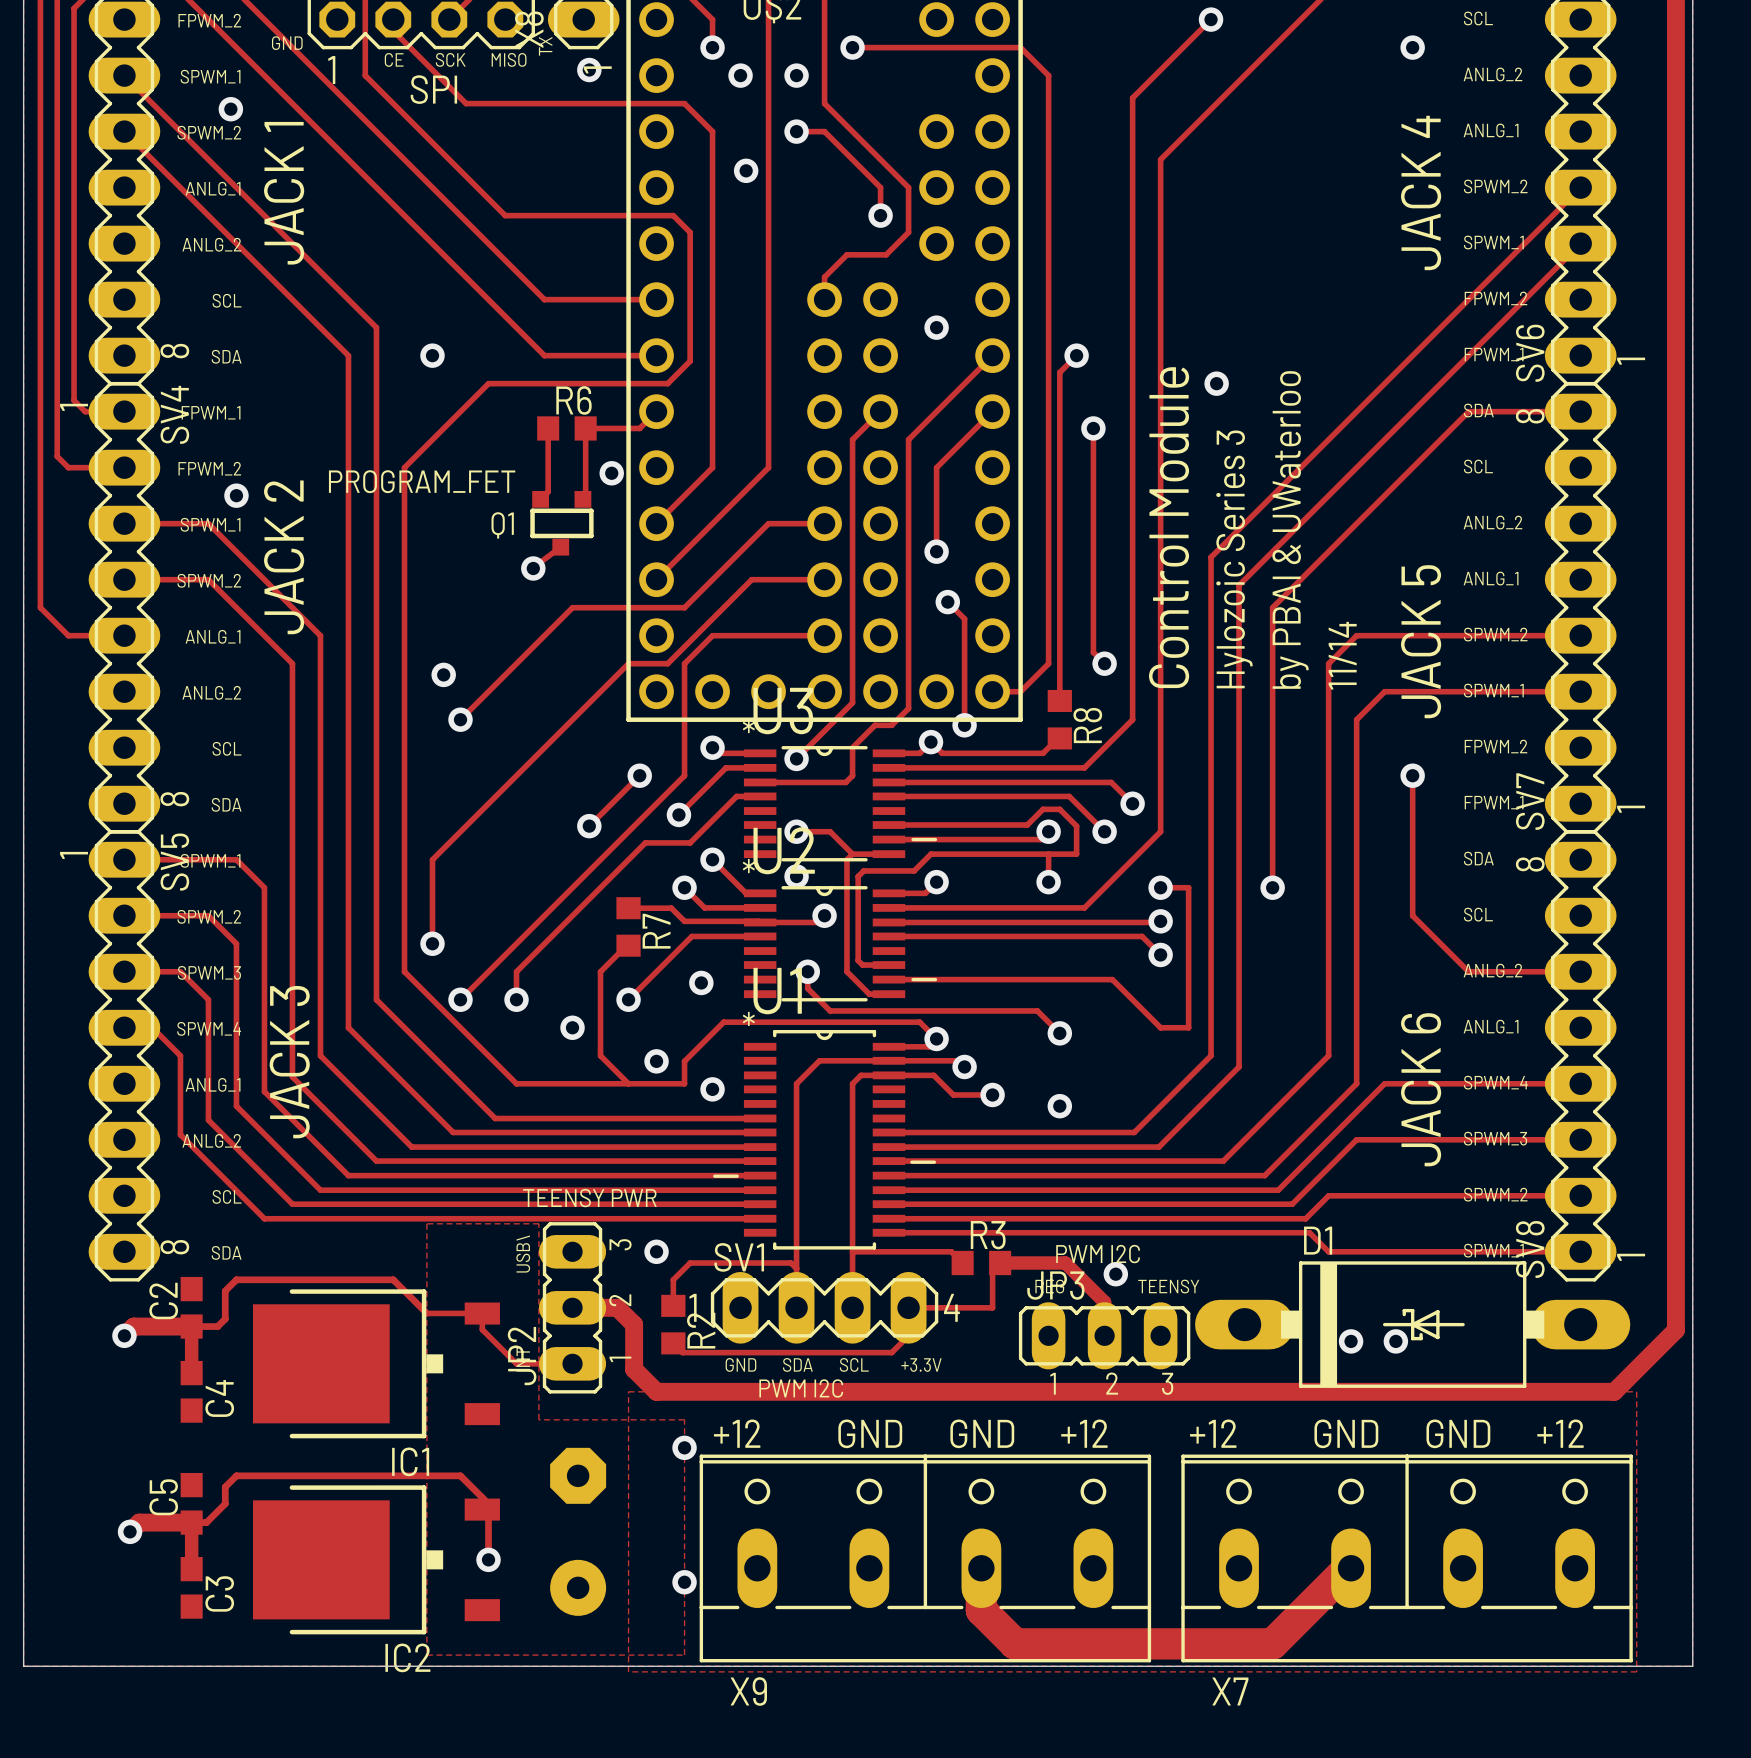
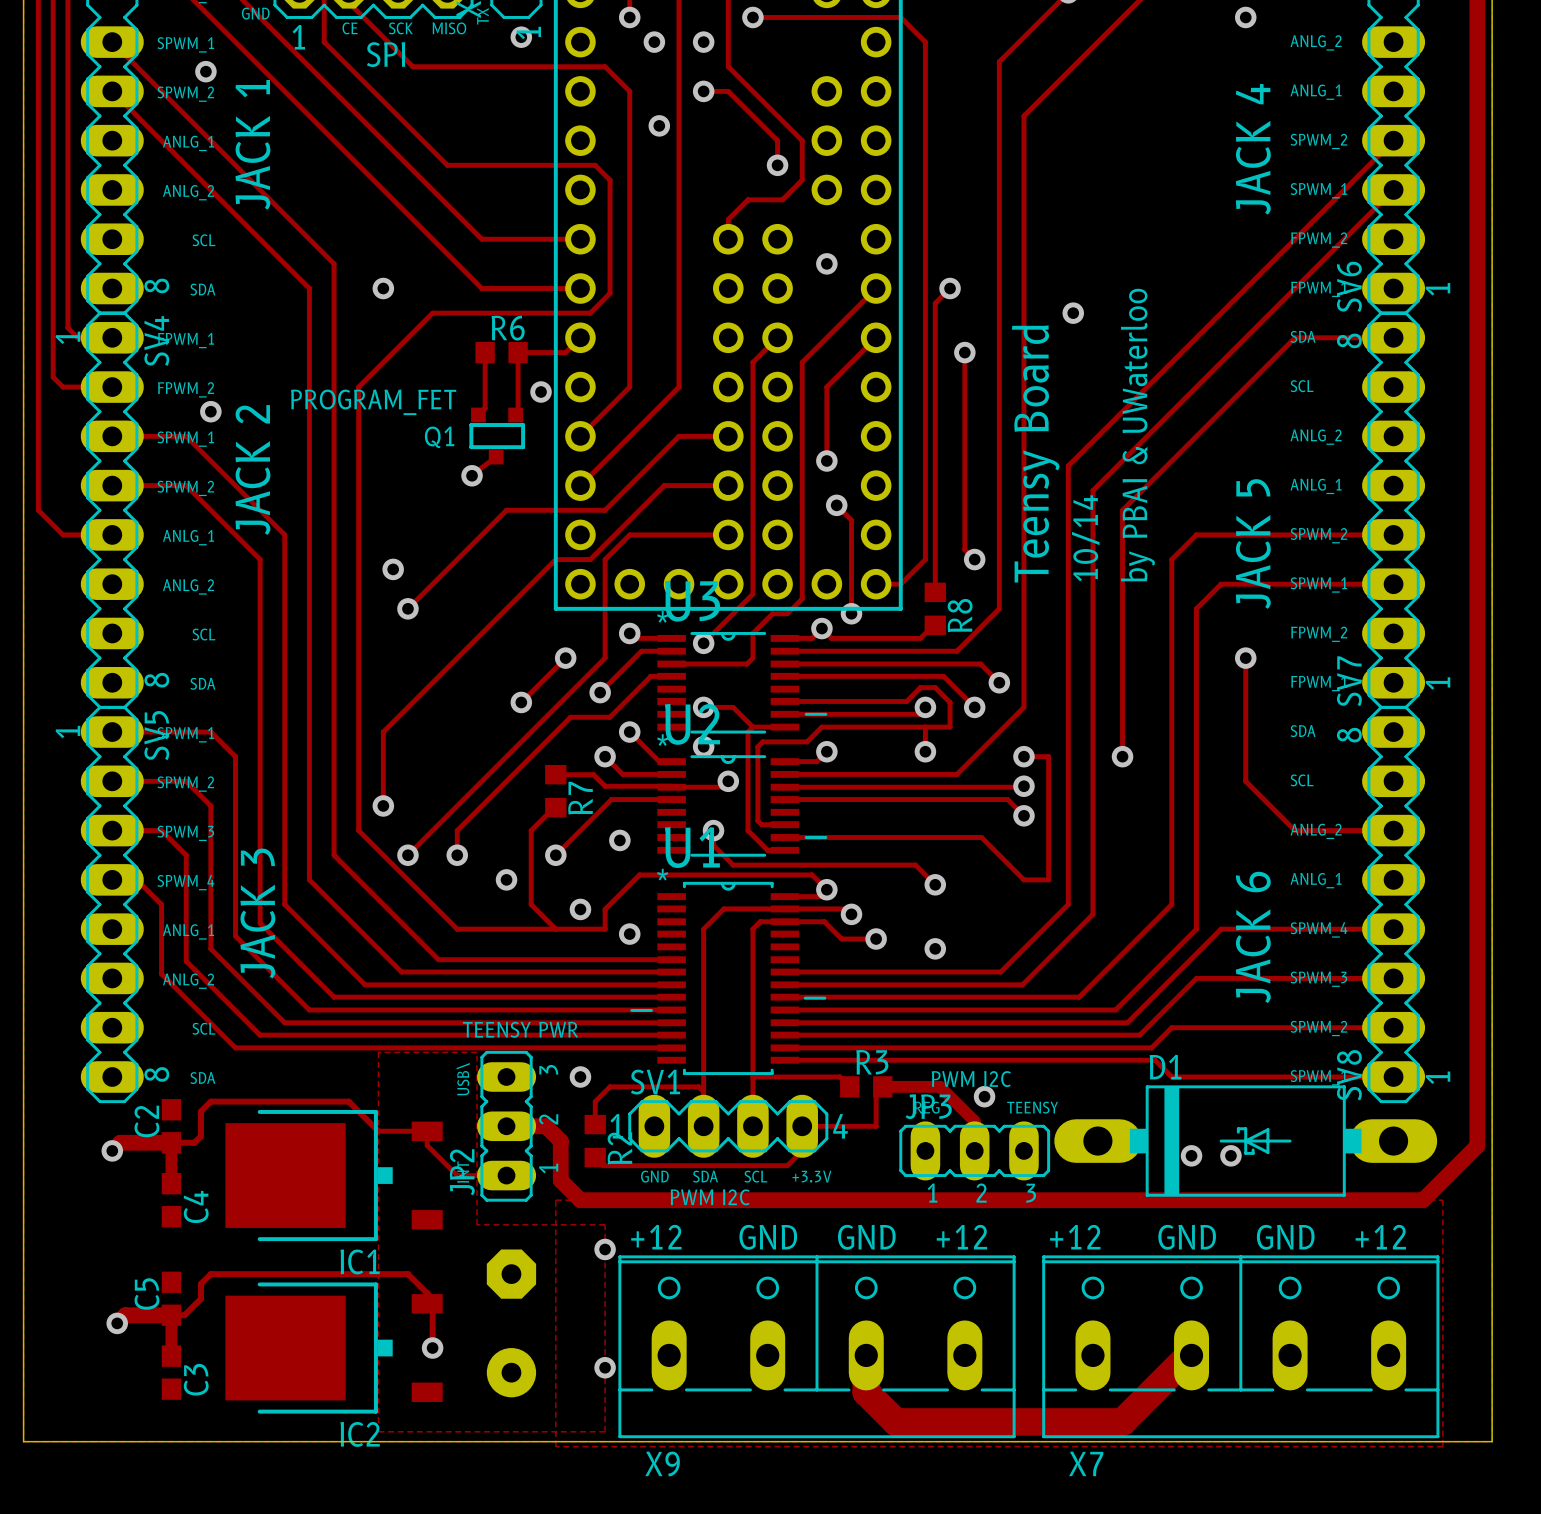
text: Control Module (1169, 527) -> Teensy Board (1035, 453)
text: Hylozoic Series 3 (1234, 559) -> 10/14 (1085, 538)
text: 11/14 (1342, 655) -> none

